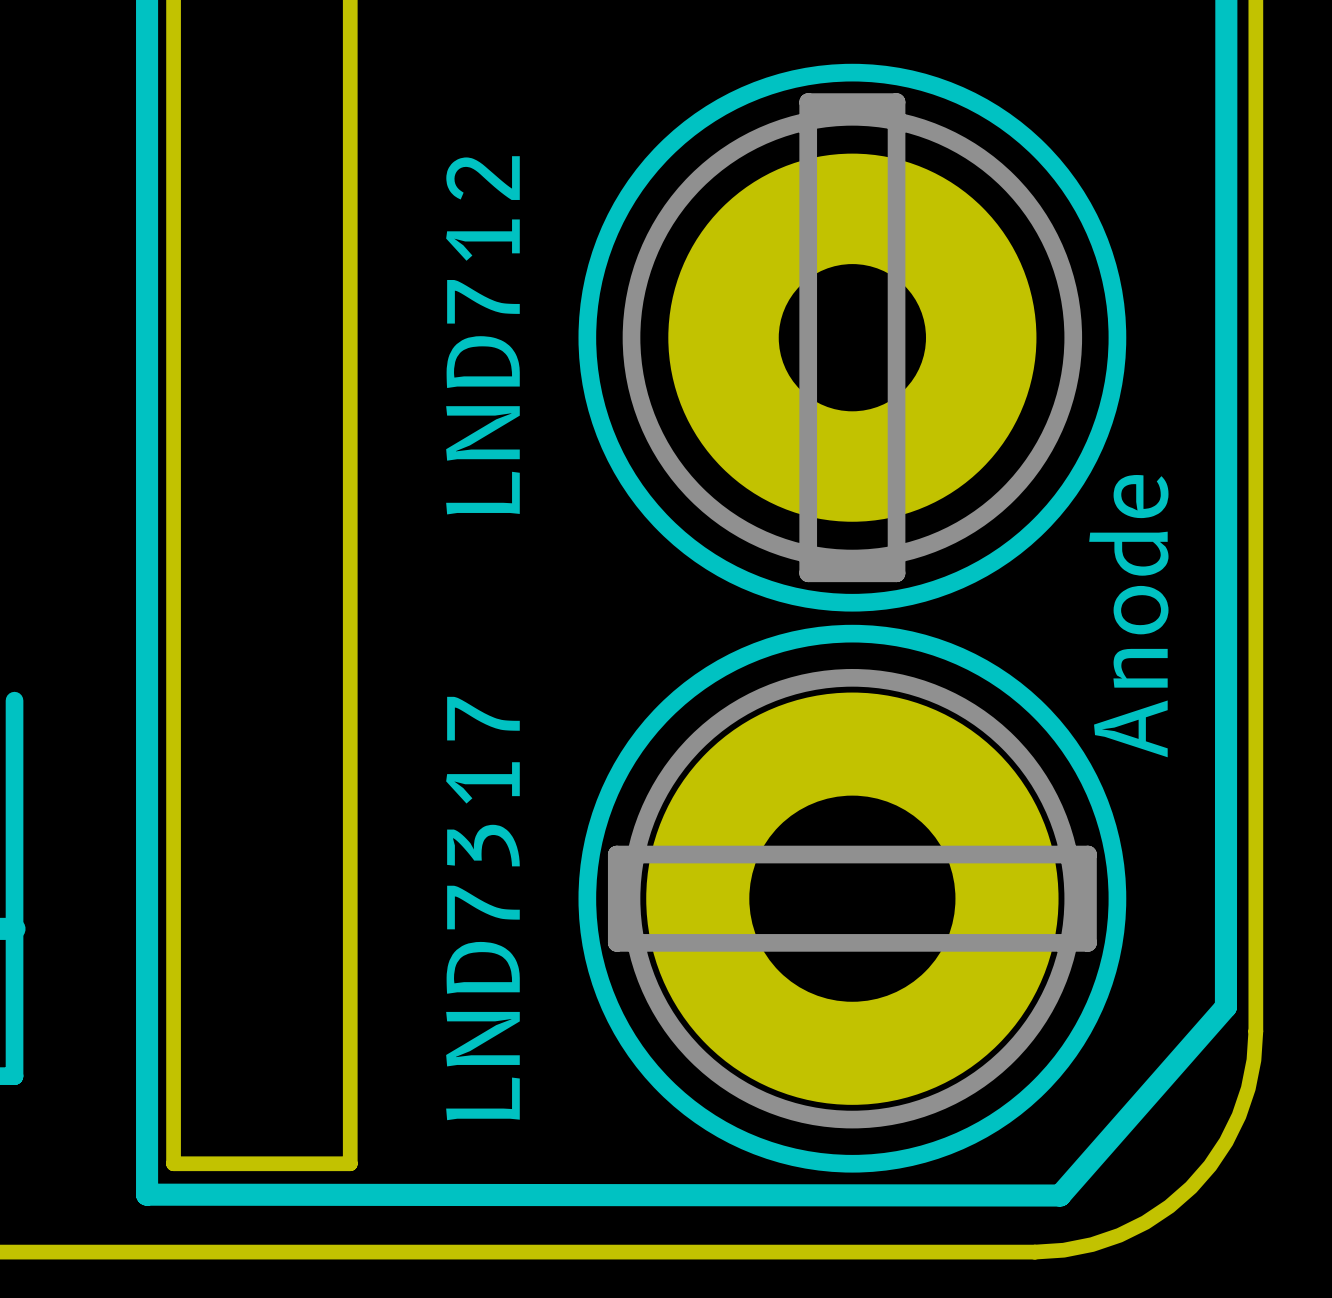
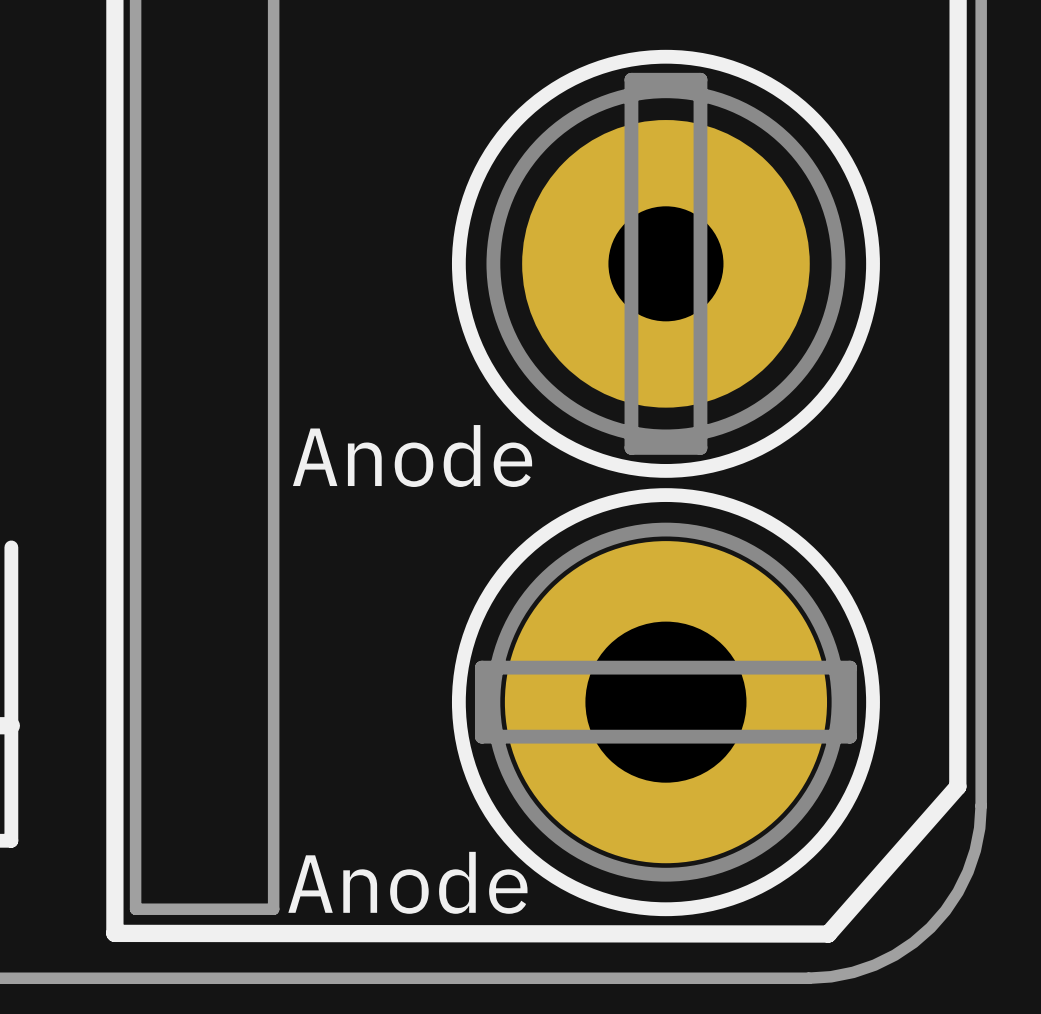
part value: LND712 (482, 335) -> Anode (412, 456)
text: Anode (1128, 616) -> none
part value: LND7317 (482, 908) -> Anode (407, 882)

